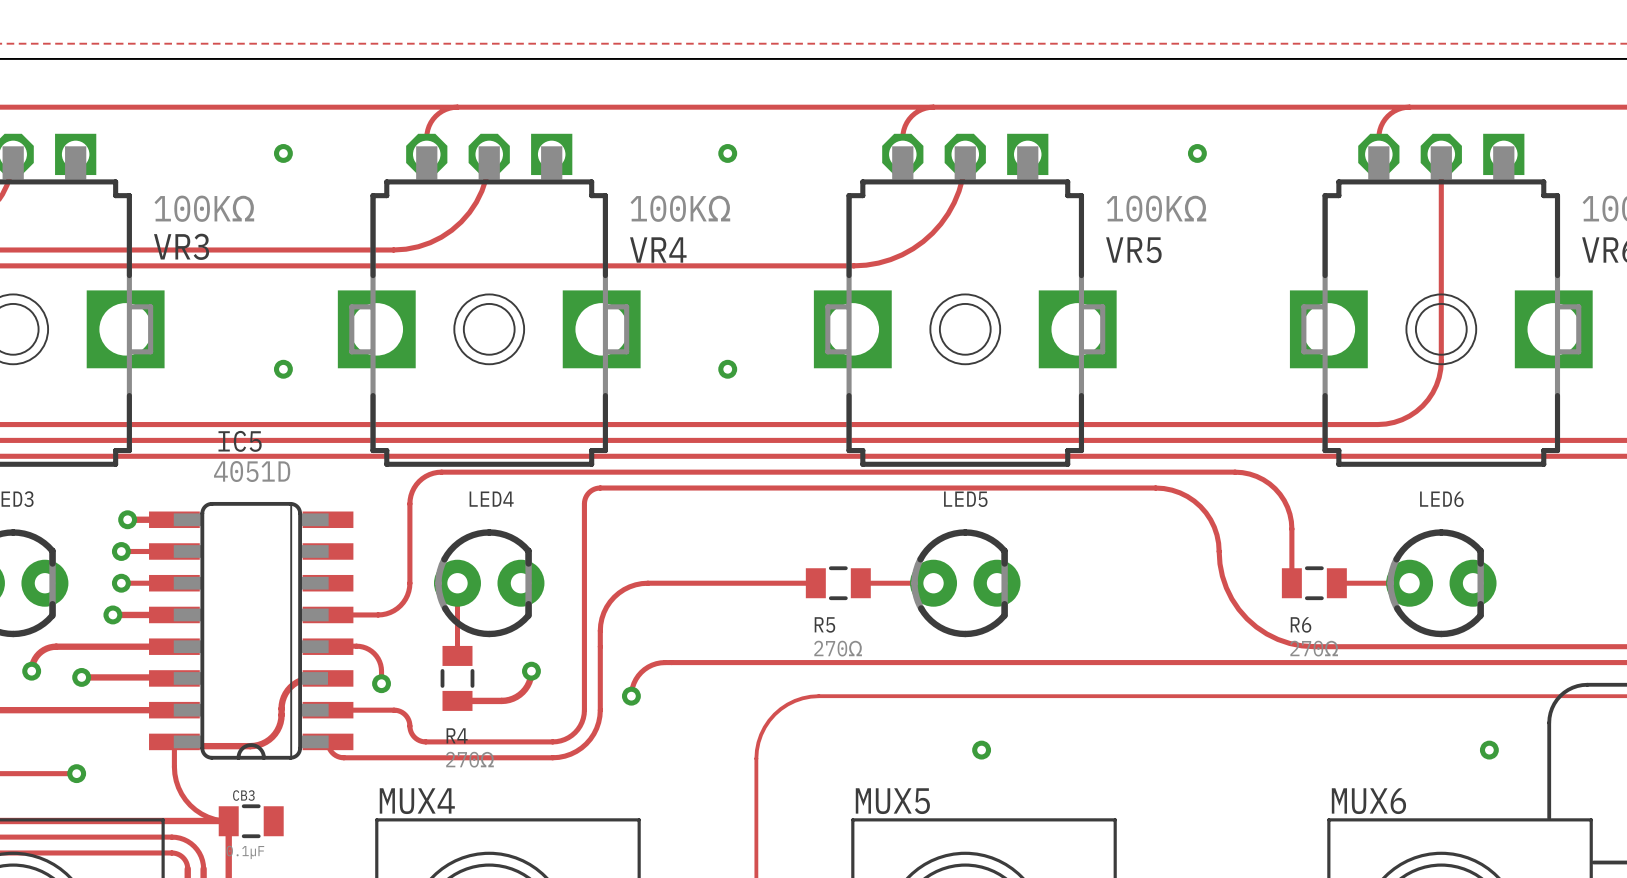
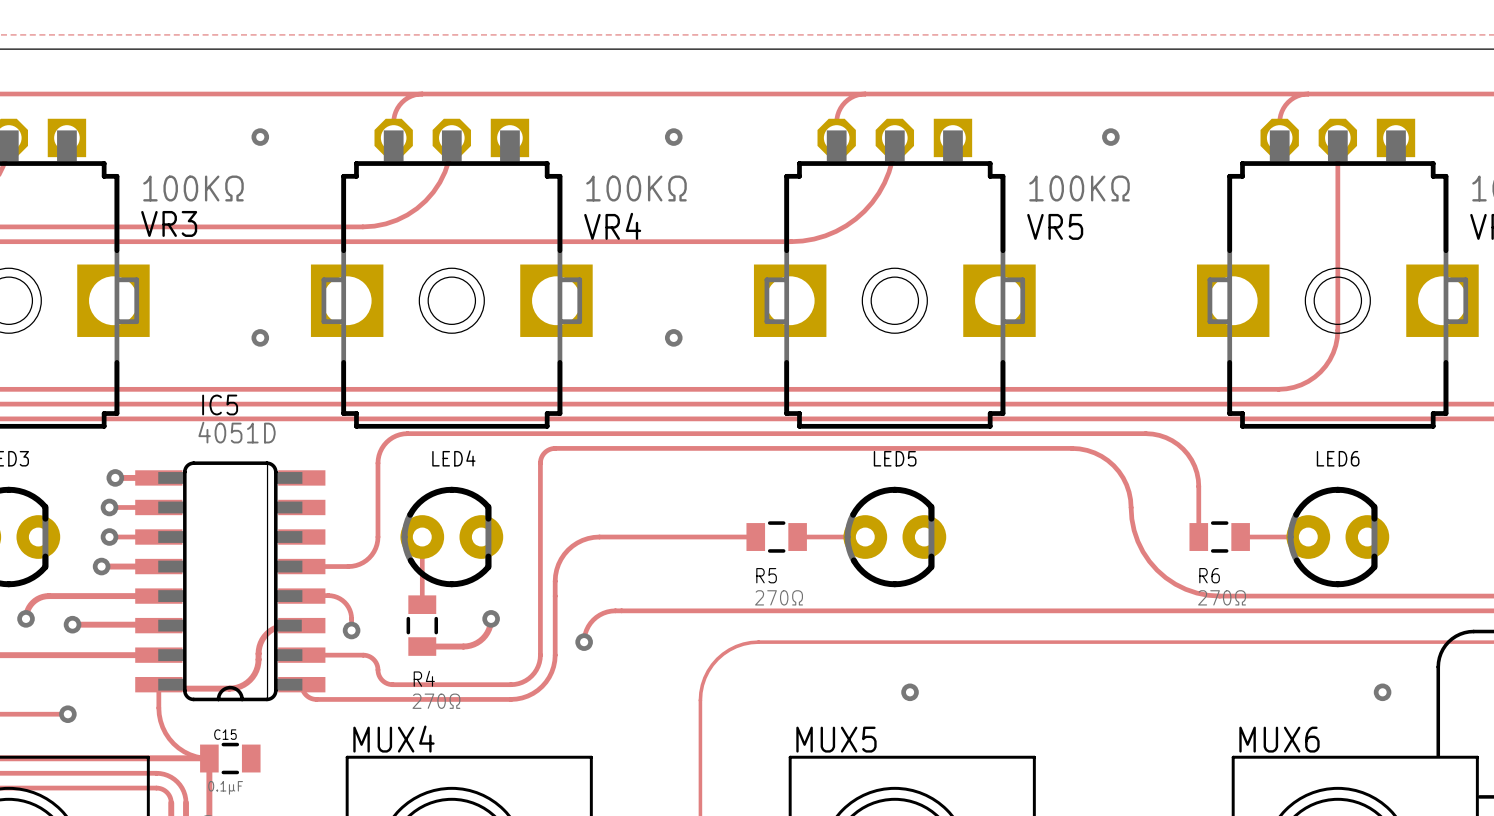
CB3 name: CB3 (243, 795) -> C15 (225, 734)

